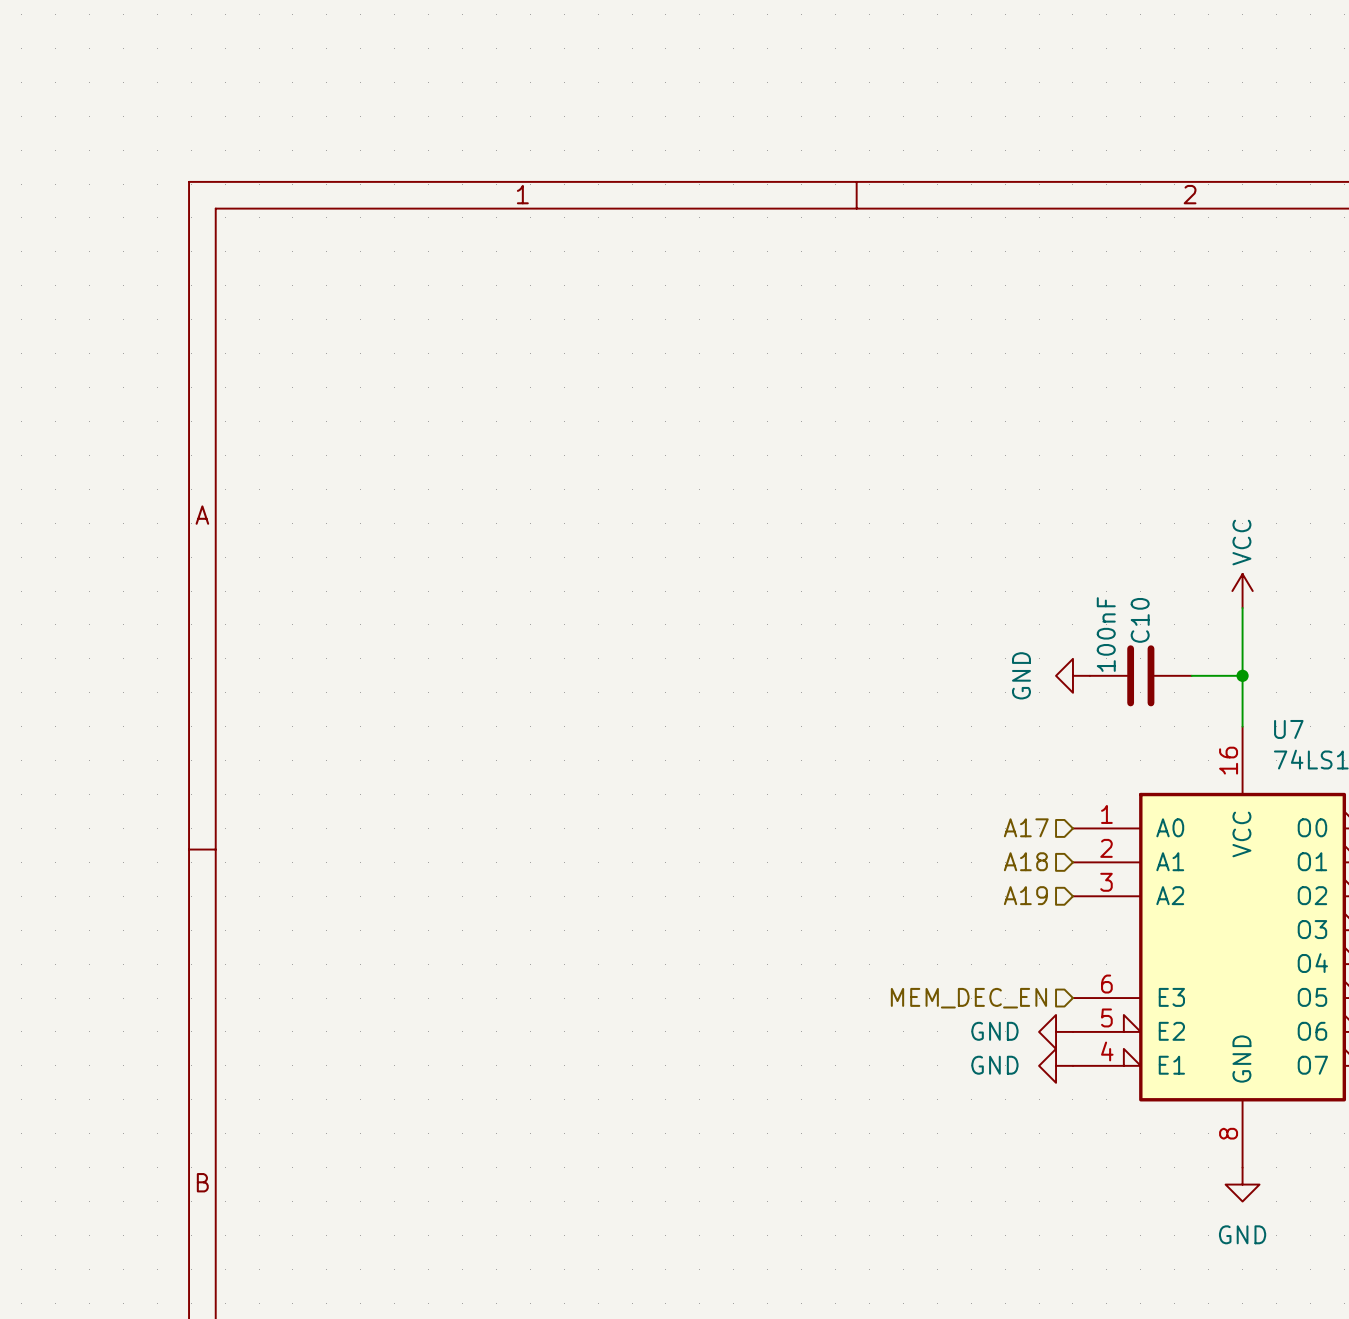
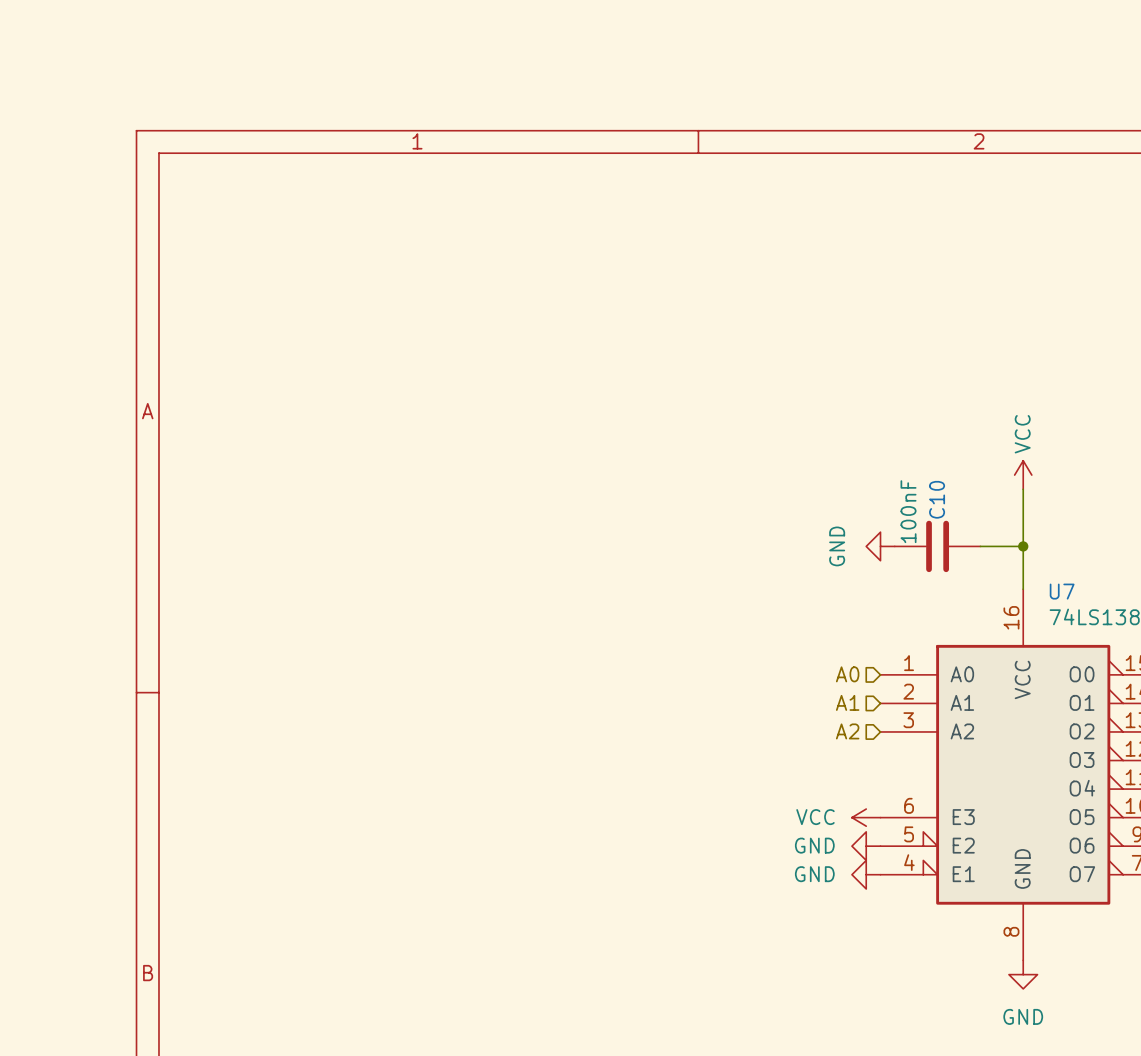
hierarchical label: A17 (1026, 827) -> A0 (847, 674)
hierarchical label: A18 (1025, 861) -> A1 (847, 702)
hierarchical label: A19 (1025, 895) -> A2 (847, 731)
hierarchical label: MEM_DEC_EN (968, 998) -> none
power symbol: none -> VCC (866, 817)

